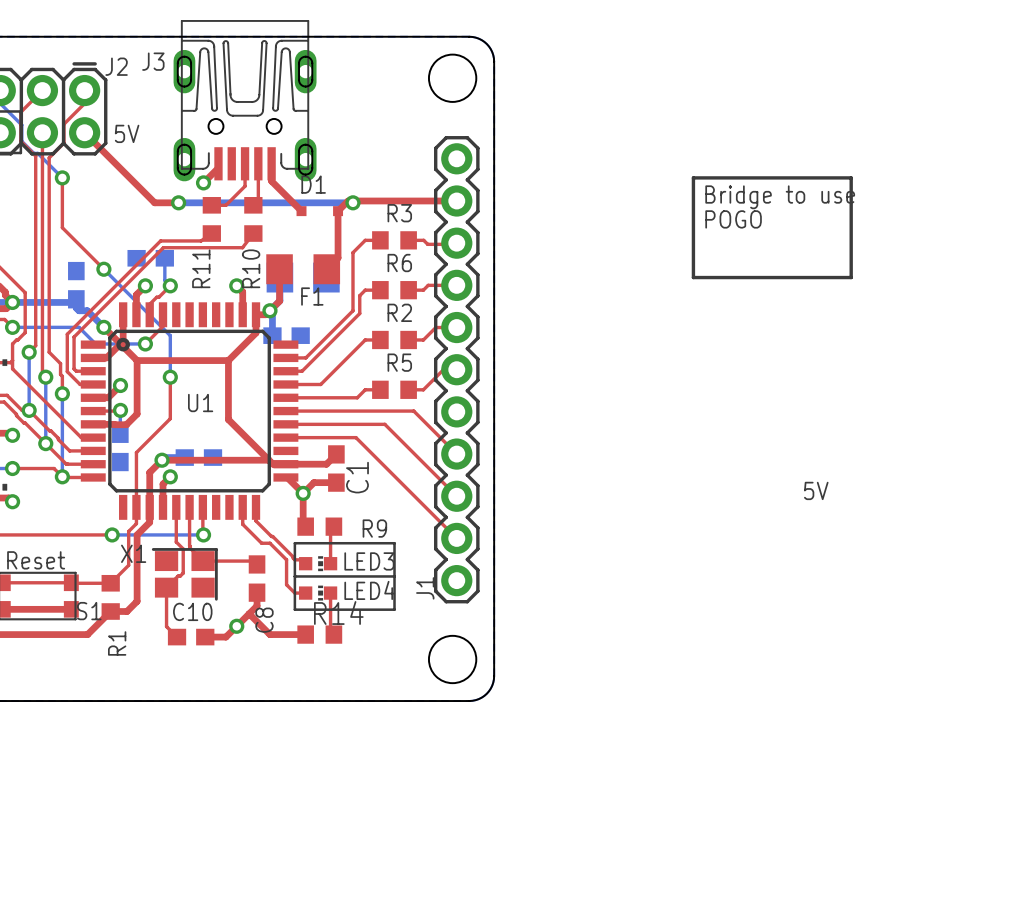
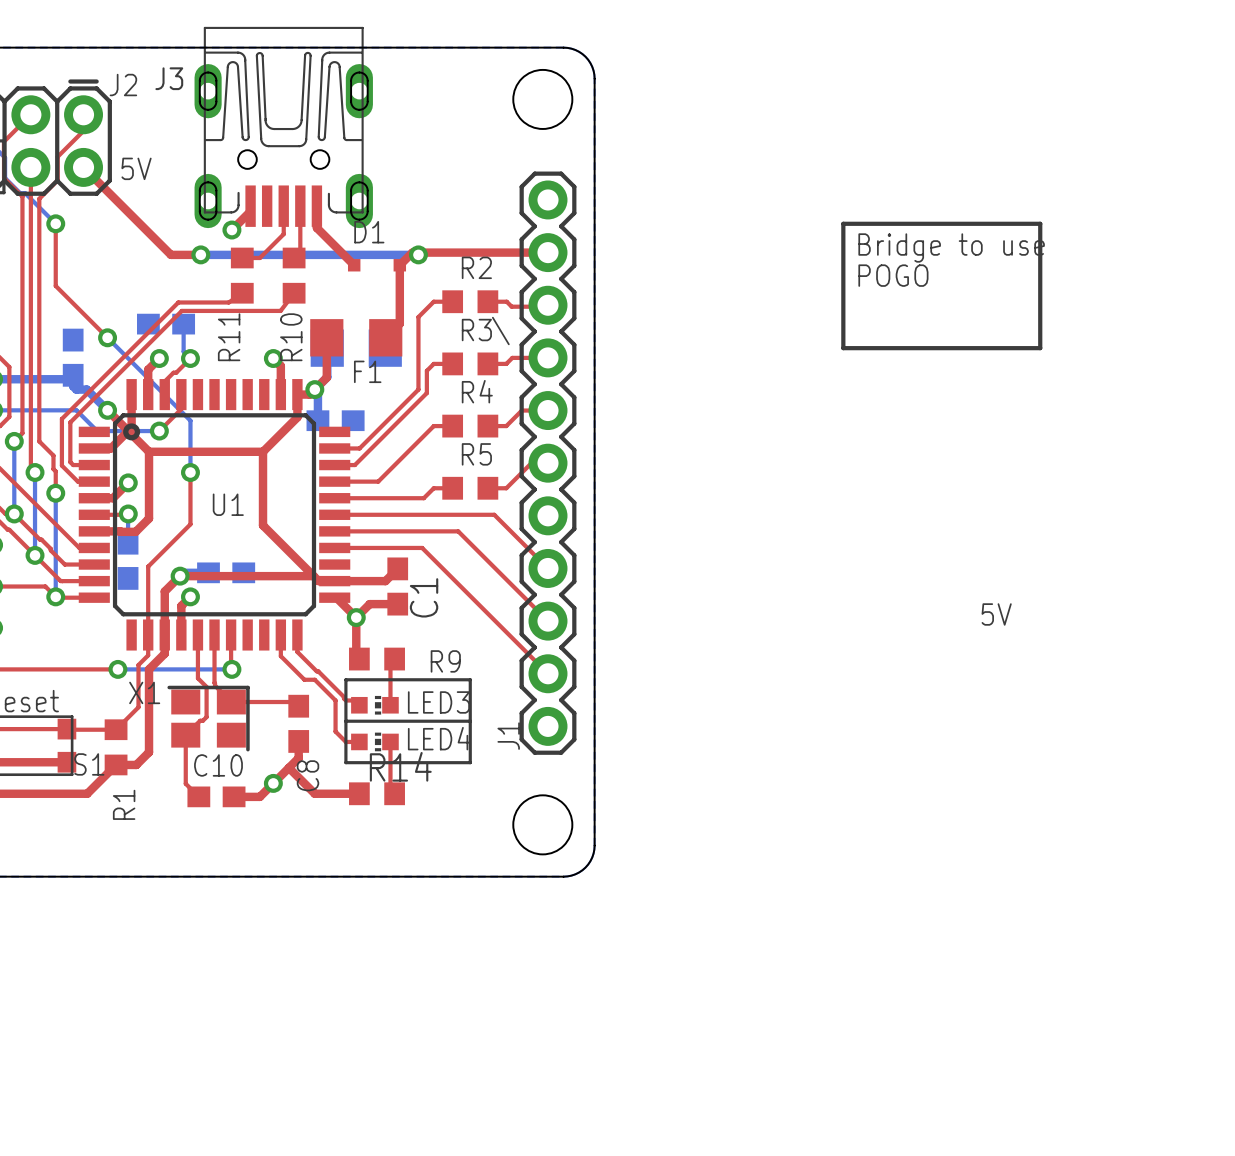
R3 name: R3 (399, 213) -> R2 (476, 267)
R6 name: R6 (399, 263) -> R3\ (485, 331)
R2 name: R2 (399, 312) -> R4 (477, 391)

